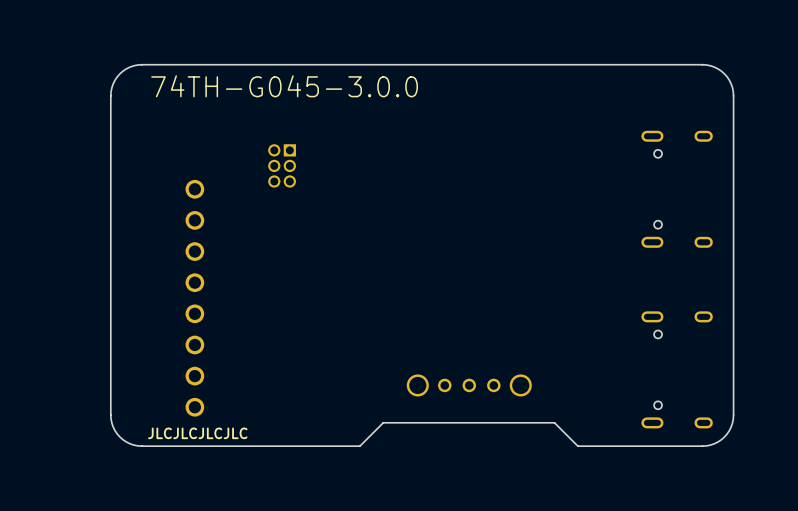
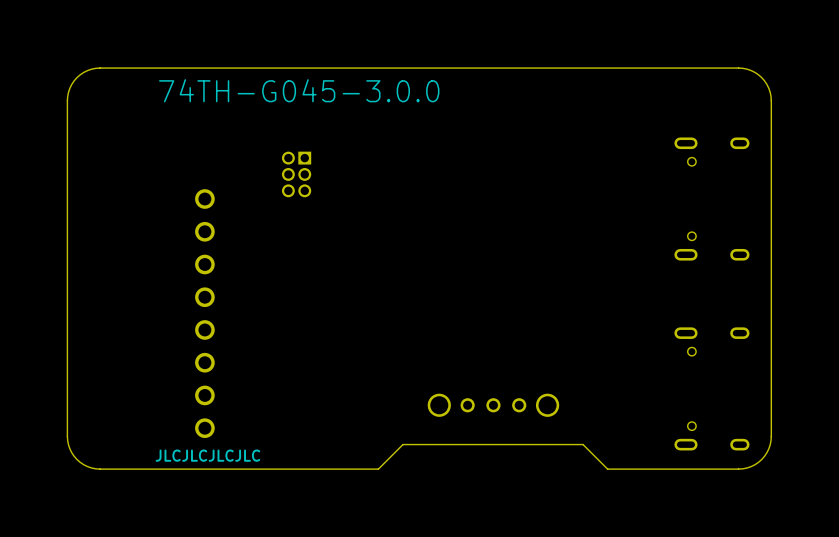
board edge: (141, 64) (130, 67) (119, 73) (113, 83) (110, 95) (111, 419) (114, 430) (119, 437) (130, 443) (141, 446) -> (149, 68) (100, 68) (87, 70) (76, 77) (71, 84) (67, 100) (68, 444) (76, 459) (91, 468) (149, 469)

